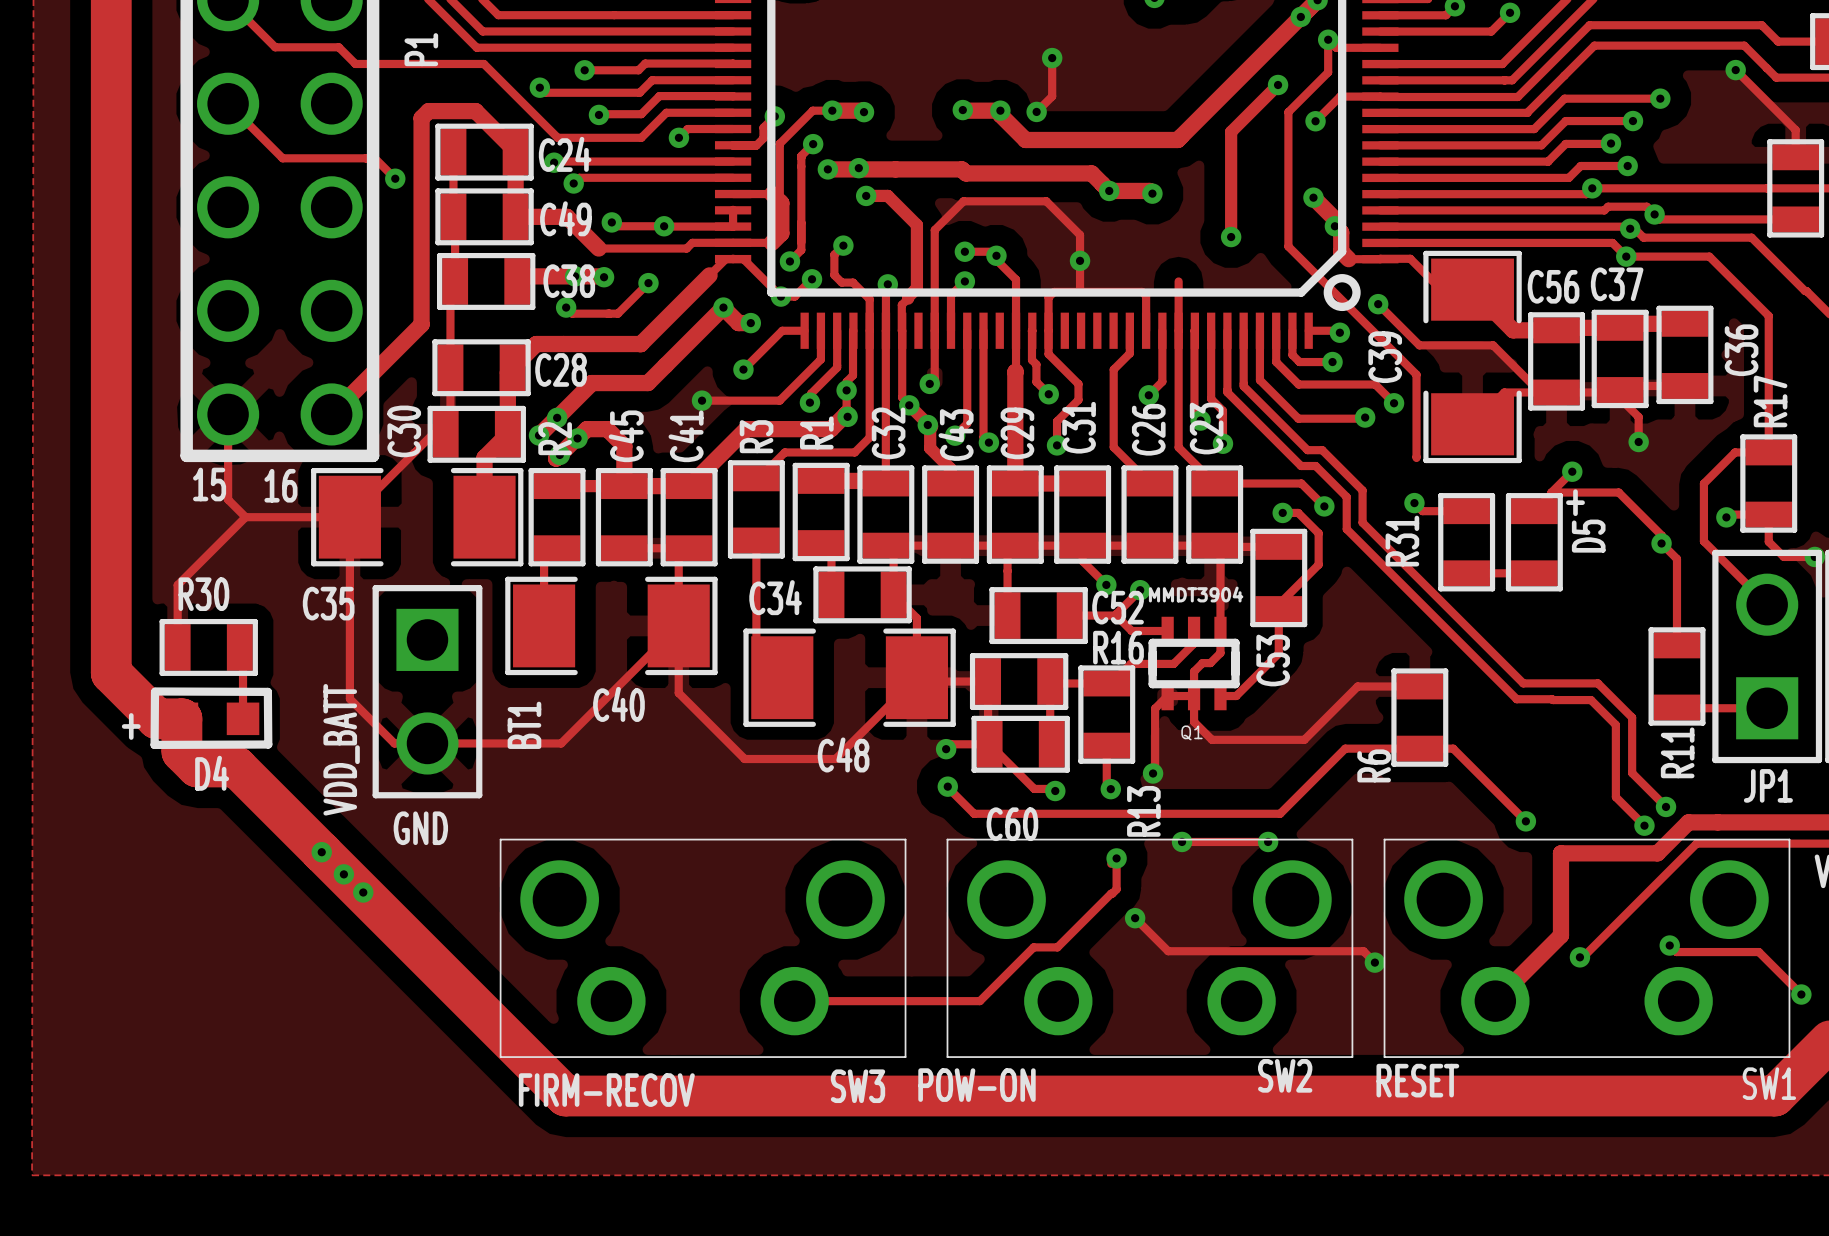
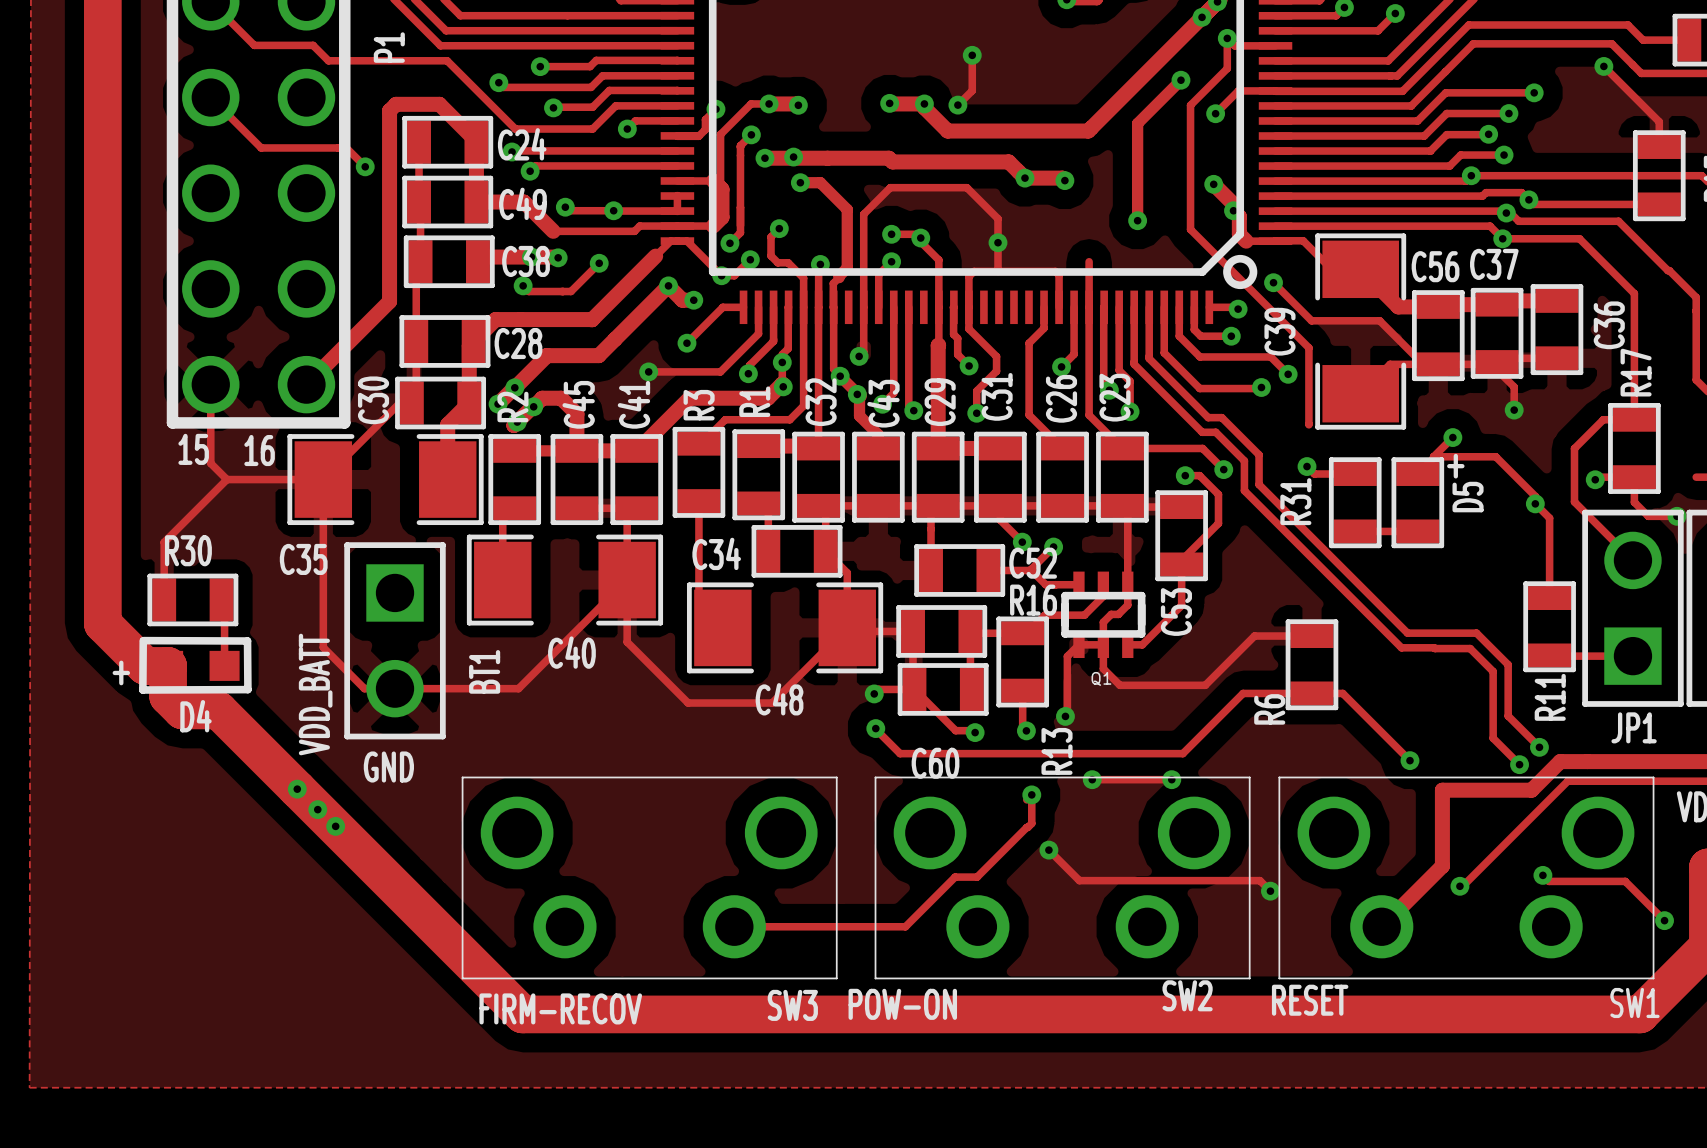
Q1 value: MMDT3904 (1196, 594) -> none

